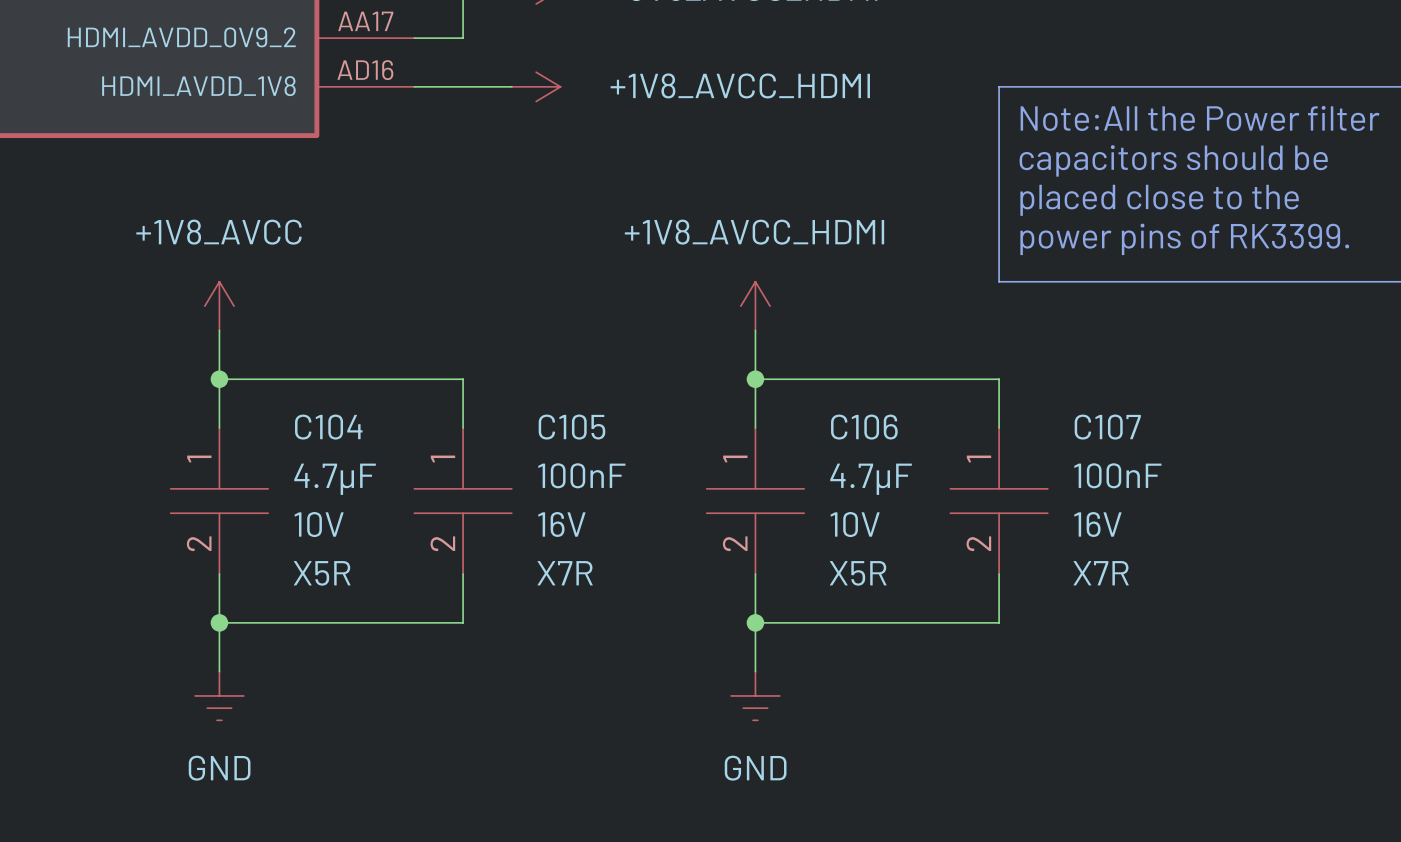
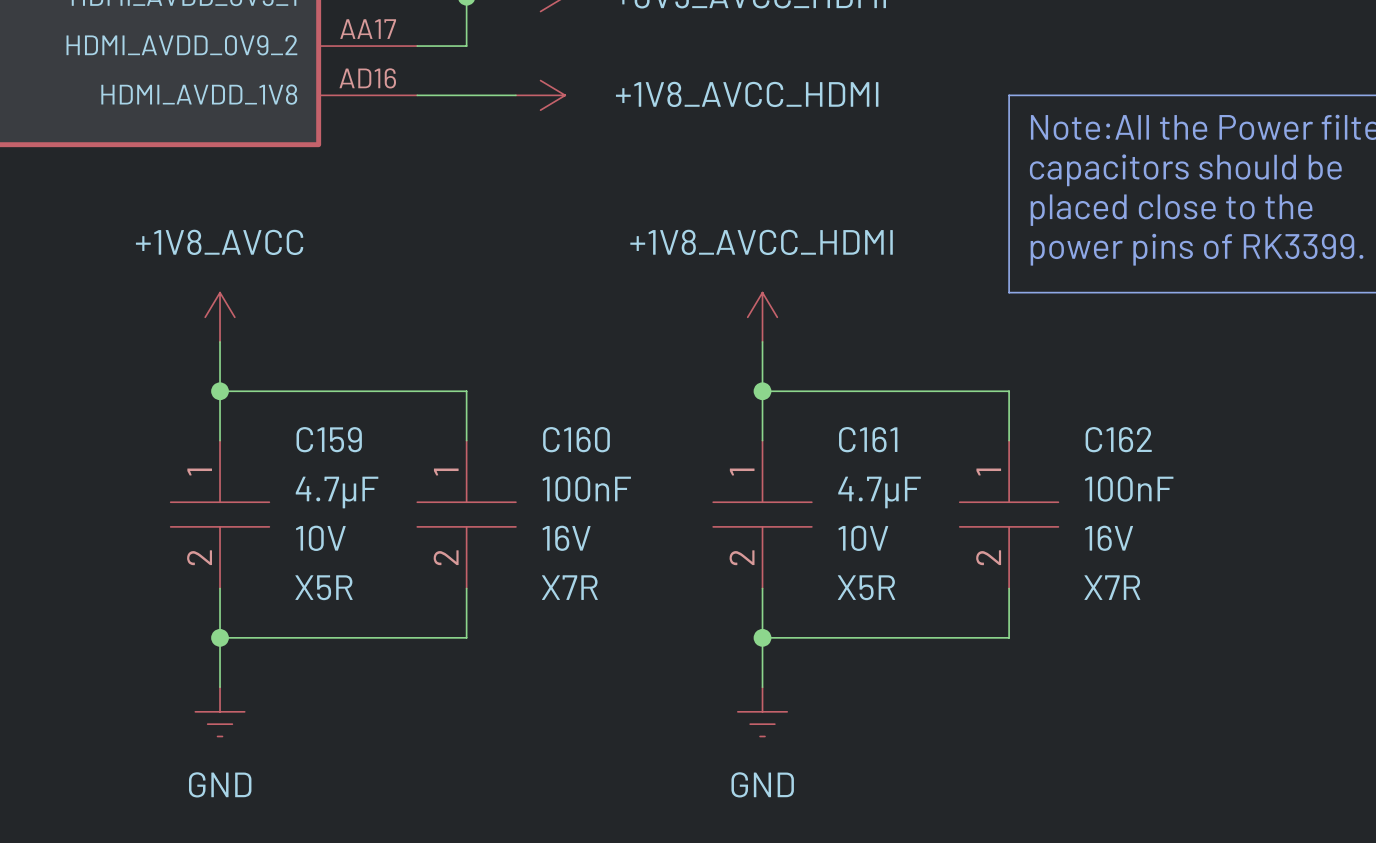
C104 name: C104 (328, 427) -> C159 (329, 439)
C105 name: C105 (571, 427) -> C160 (576, 439)
C106 name: C106 (864, 427) -> C161 (868, 439)
C107 name: C107 (1107, 427) -> C162 (1118, 439)

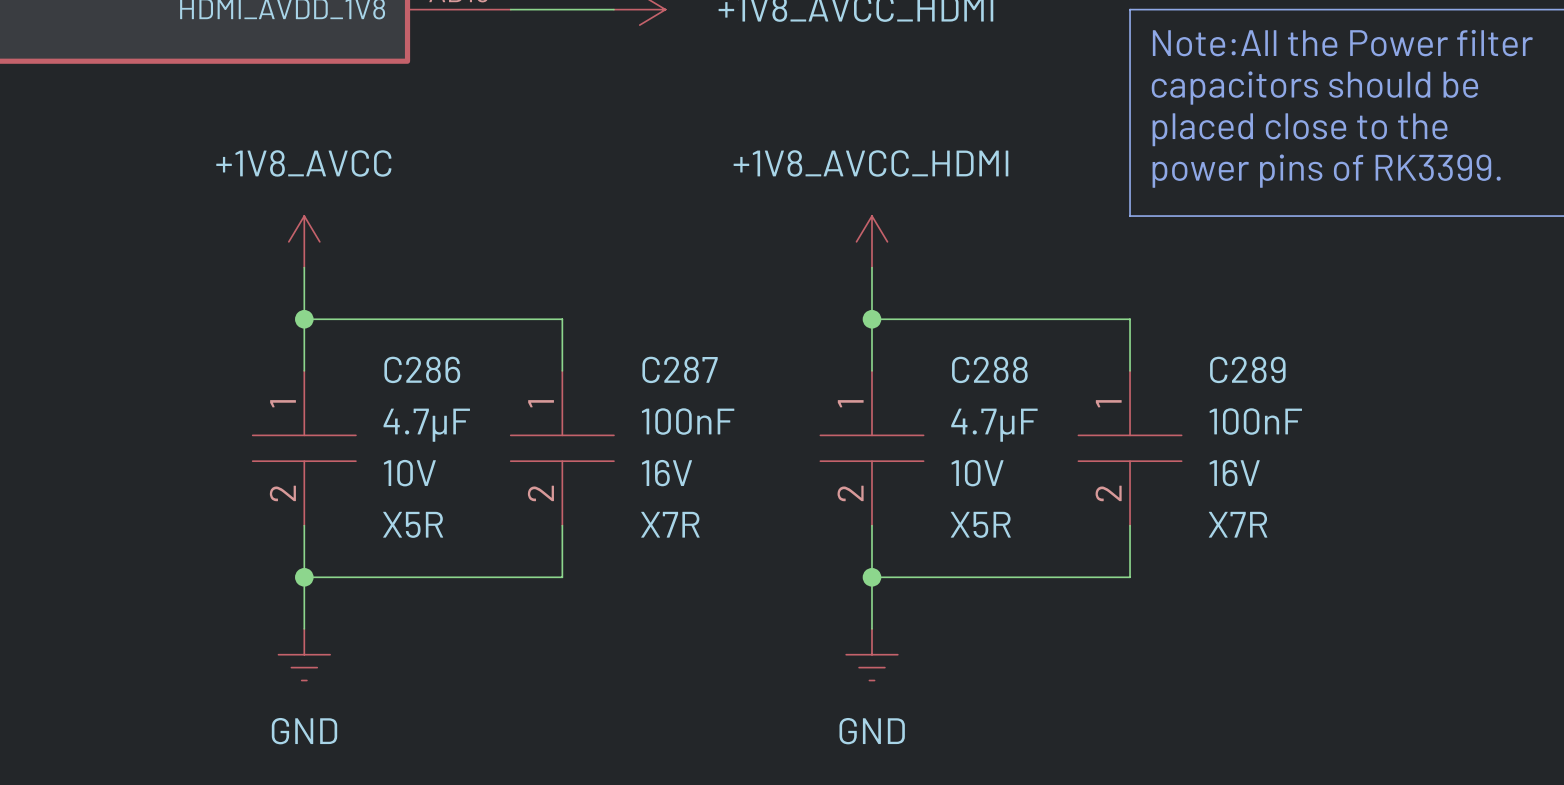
C159 name: C159 (329, 439) -> C286 (422, 369)
C160 name: C160 (576, 439) -> C287 (680, 369)
C161 name: C161 (868, 439) -> C288 (989, 369)
C162 name: C162 (1118, 439) -> C289 (1247, 369)

